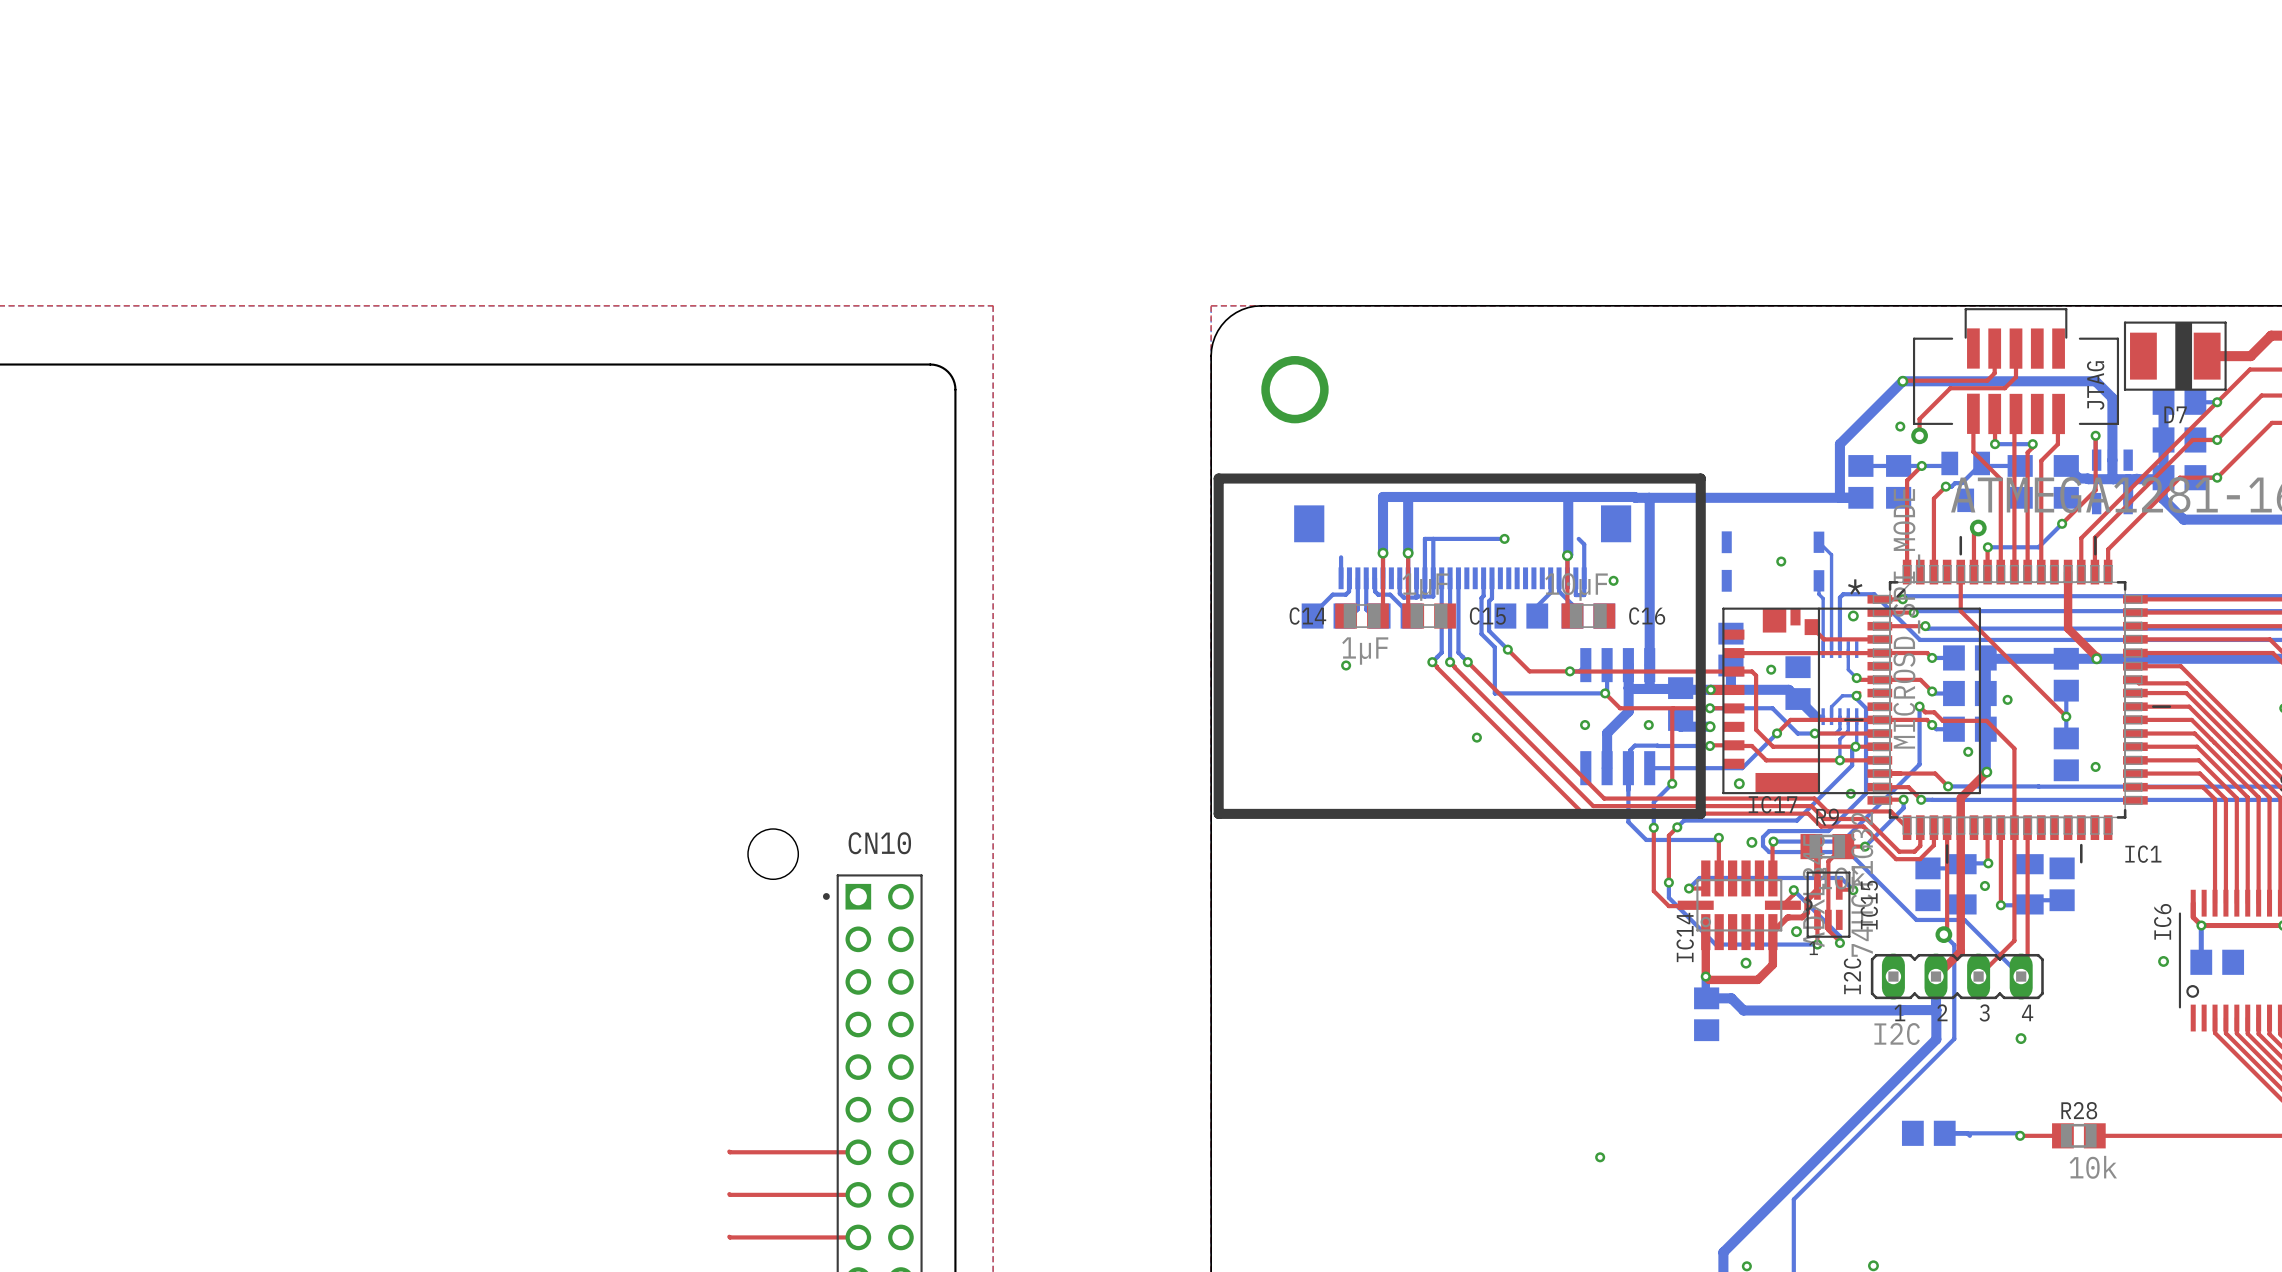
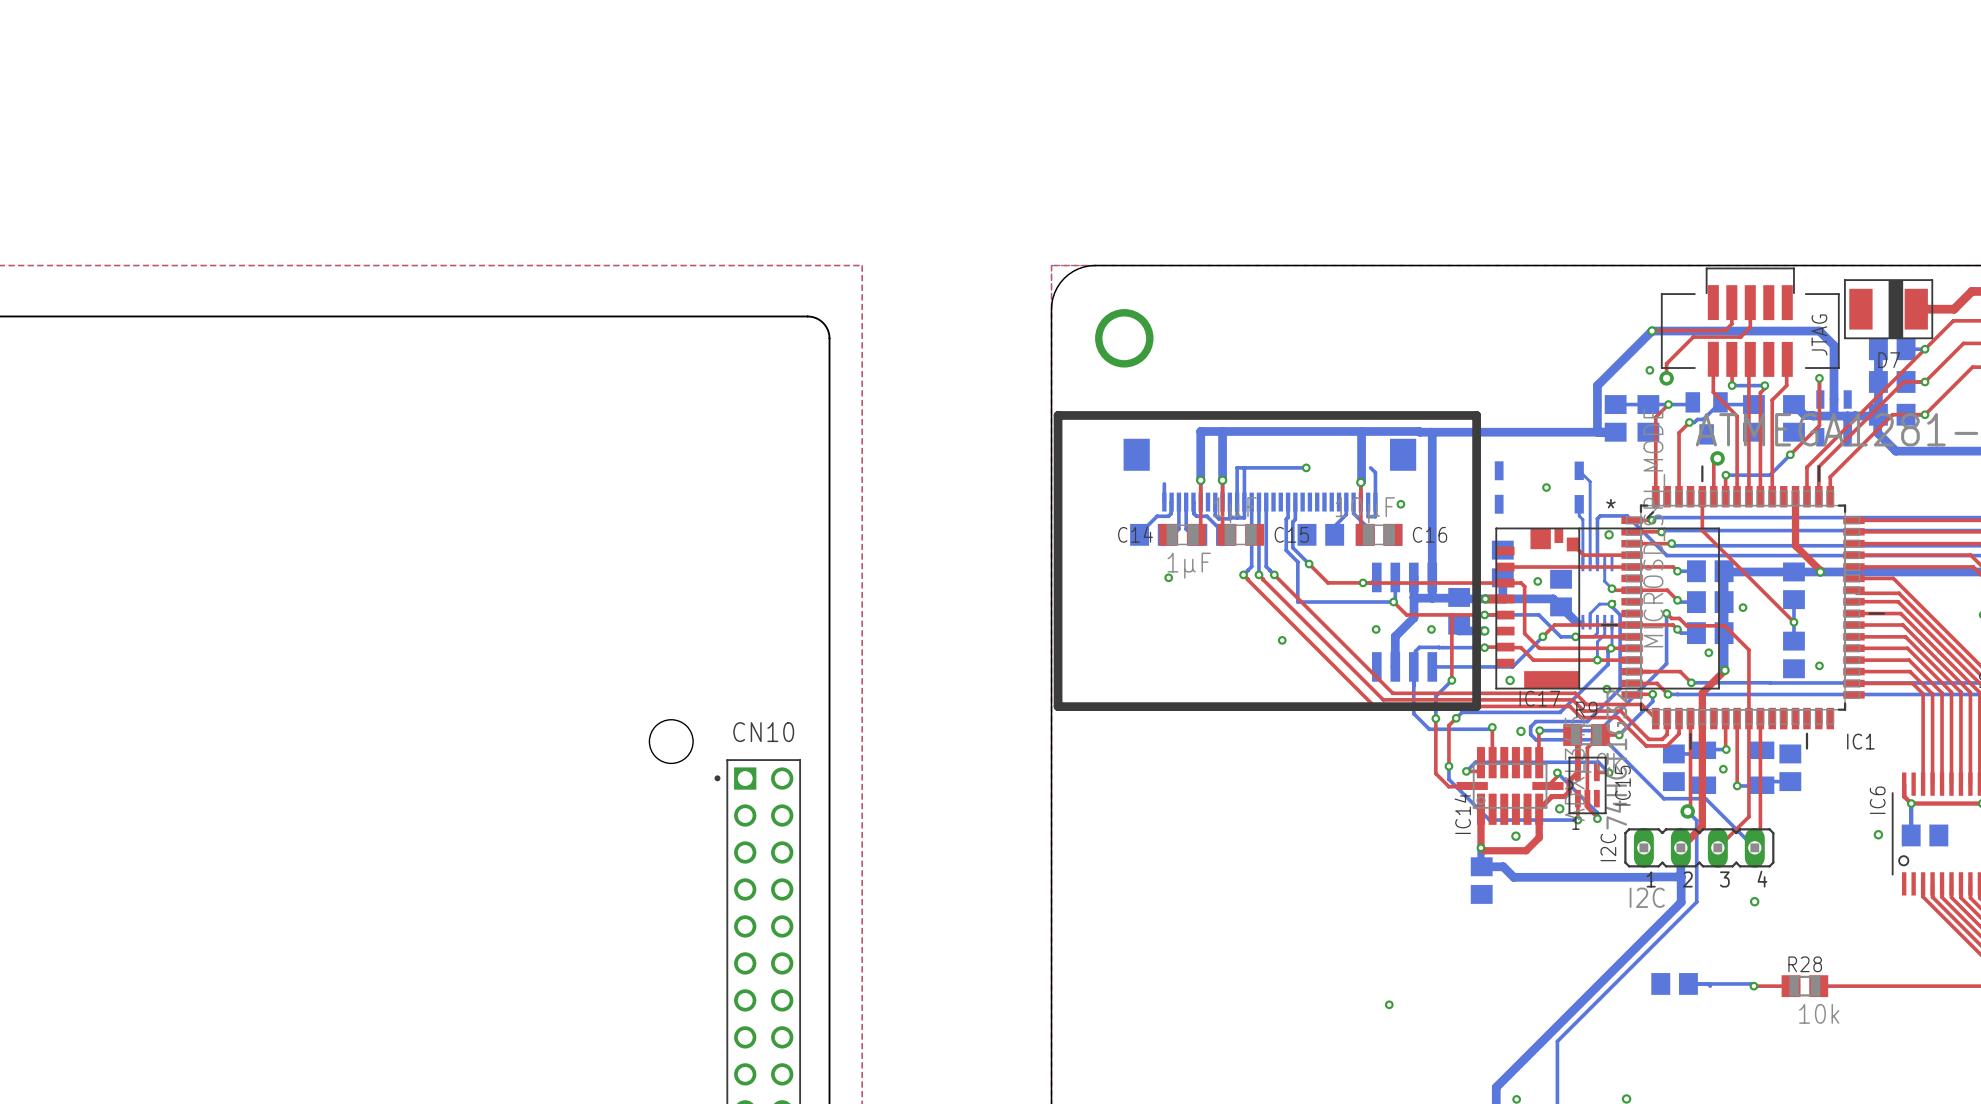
top track: (729, 1151) (858, 1152) -> none
top track: (729, 1194) (858, 1194) -> none
top track: (729, 1236) (858, 1237) -> none

